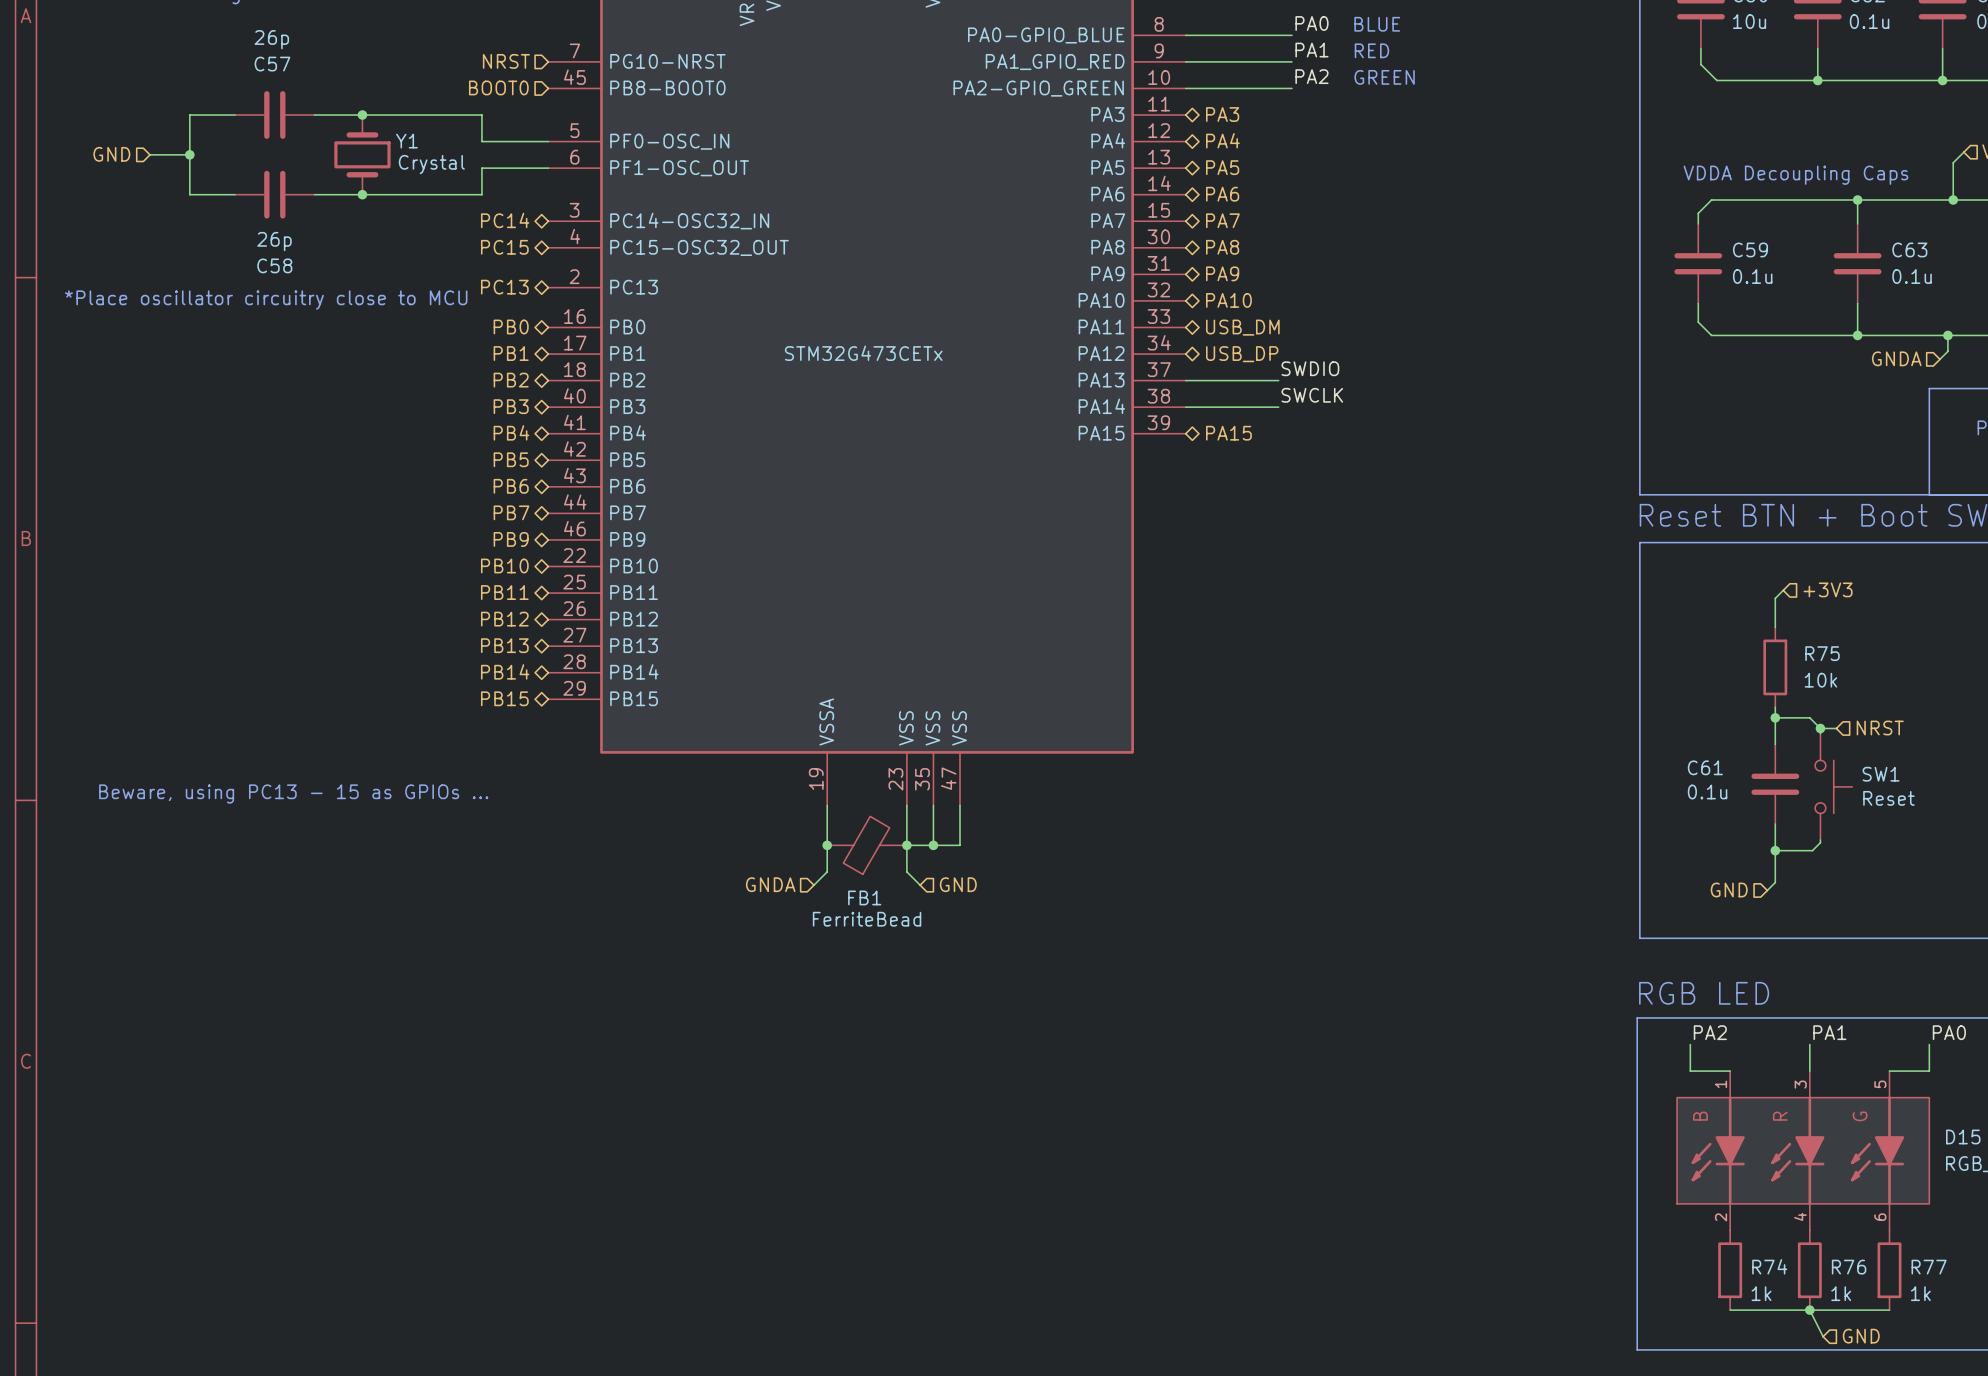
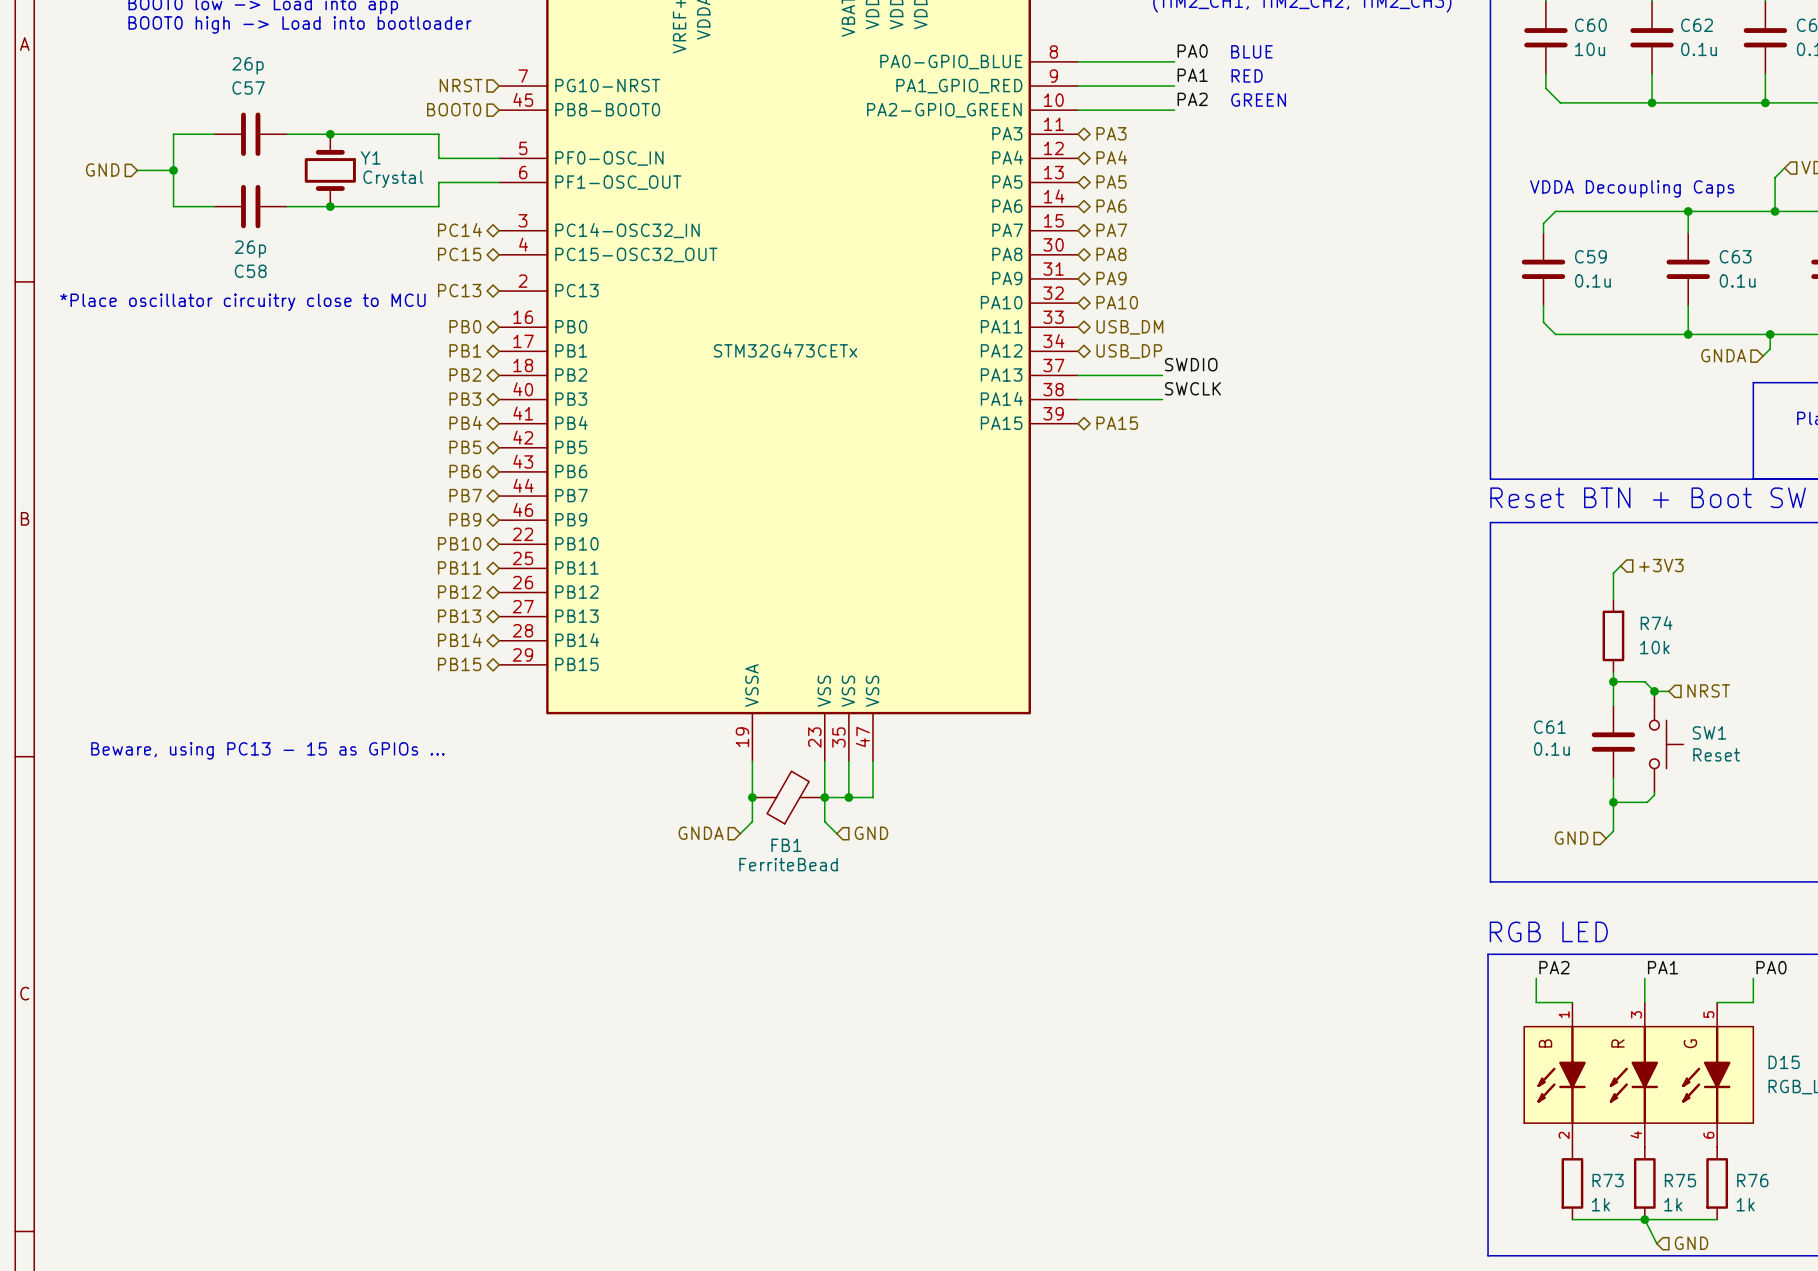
R75 name: R75 (1822, 653) -> R74 (1656, 623)
R74 name: R74 (1769, 1266) -> R73 (1608, 1180)
R76 name: R76 (1849, 1267) -> R75 (1680, 1180)
R77 name: R77 (1929, 1267) -> R76 (1752, 1180)

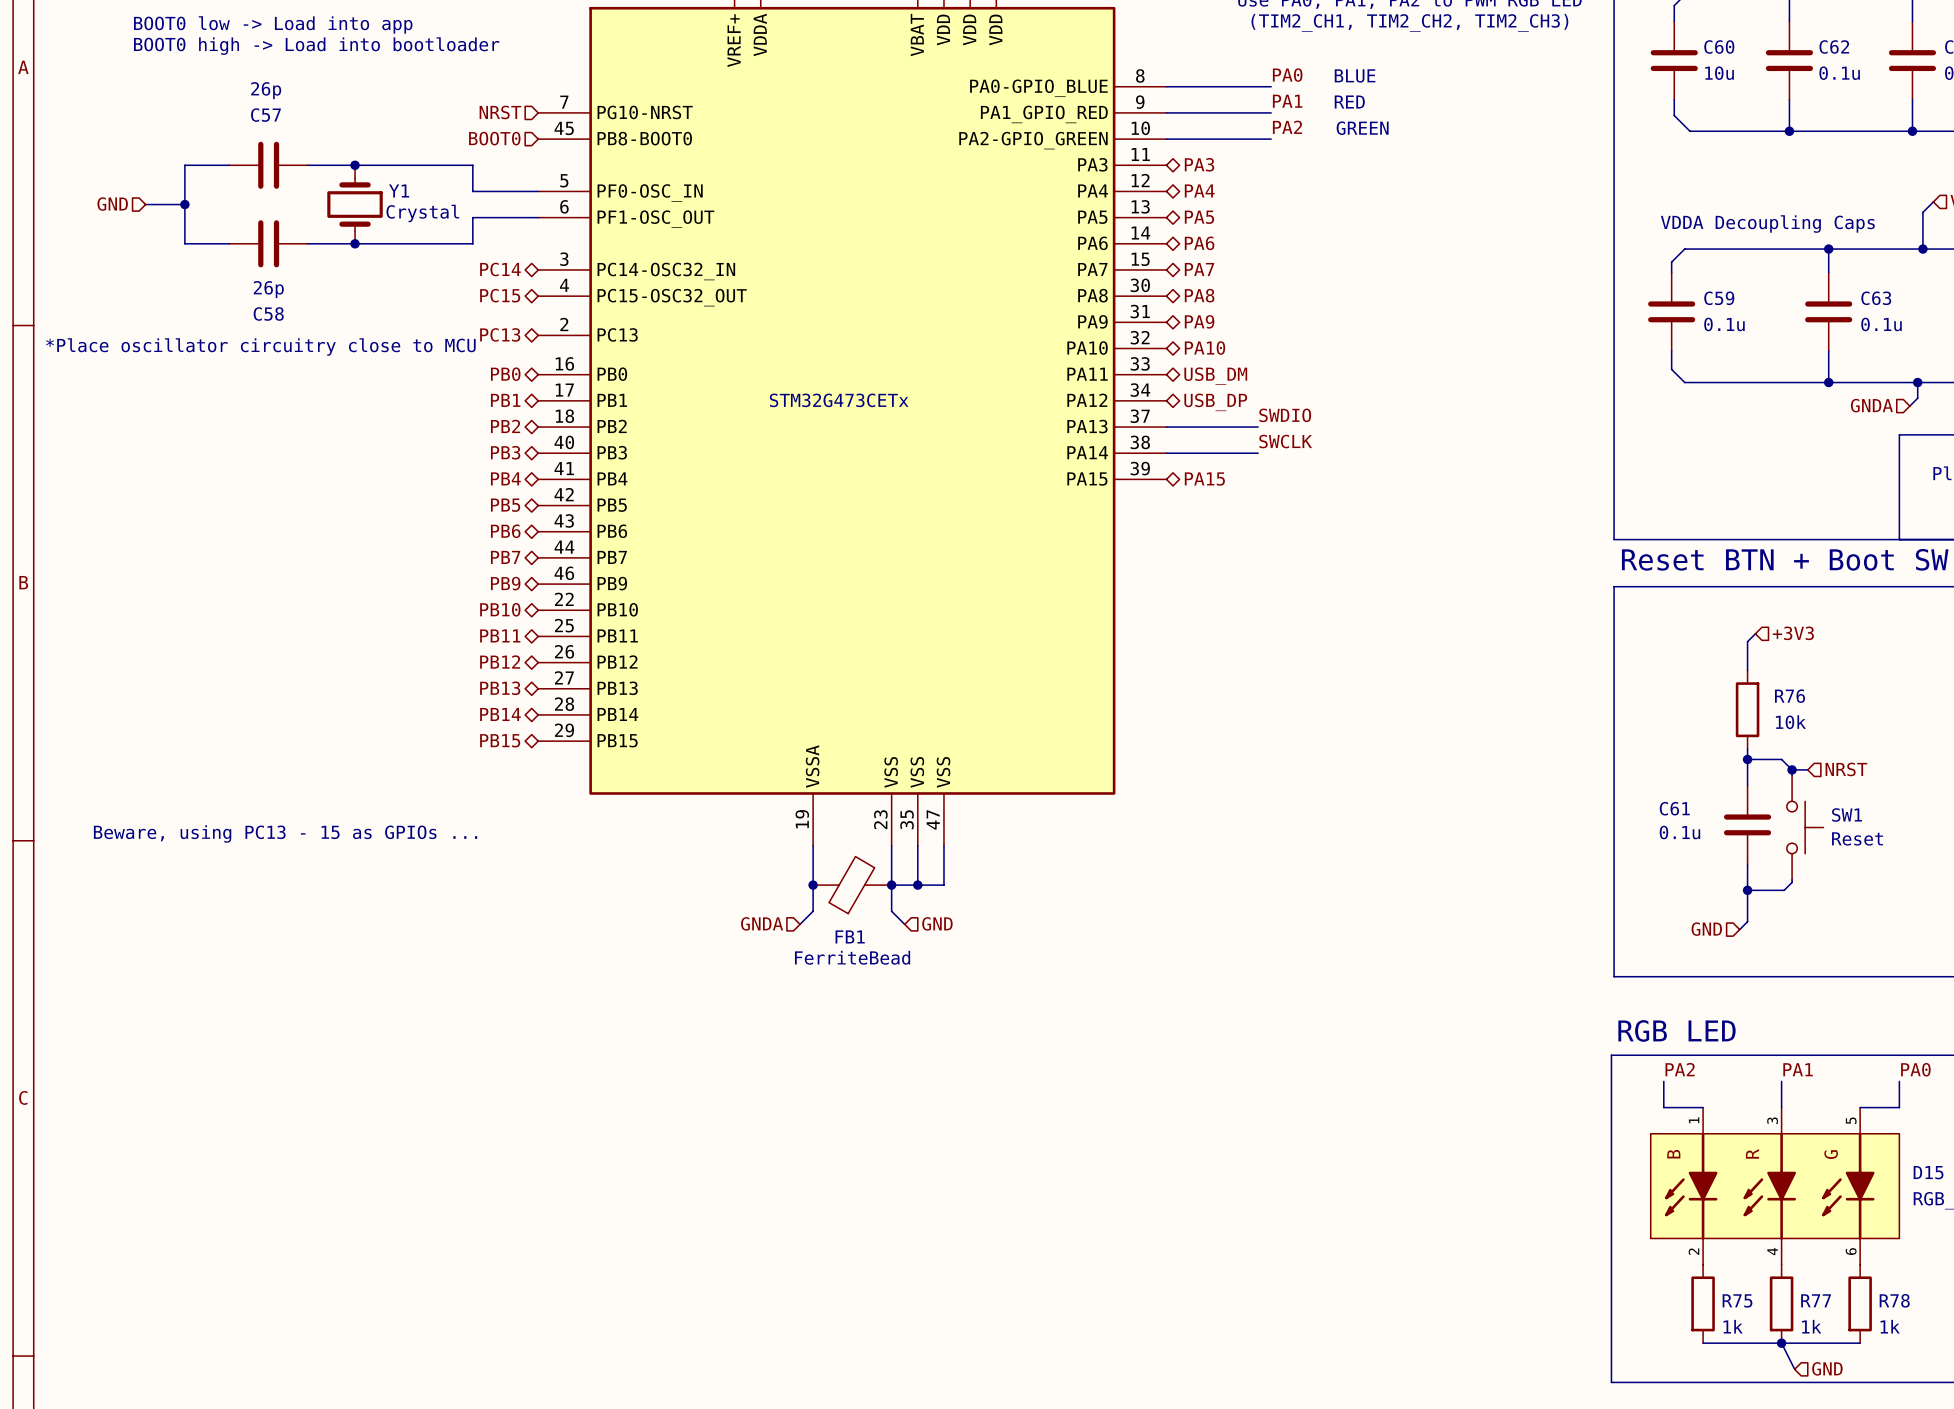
R74 name: R74 (1656, 623) -> R76 (1789, 696)
R73 name: R73 (1608, 1180) -> R75 (1737, 1300)
R75 name: R75 (1680, 1180) -> R77 (1816, 1300)
R76 name: R76 (1752, 1180) -> R78 (1894, 1300)

